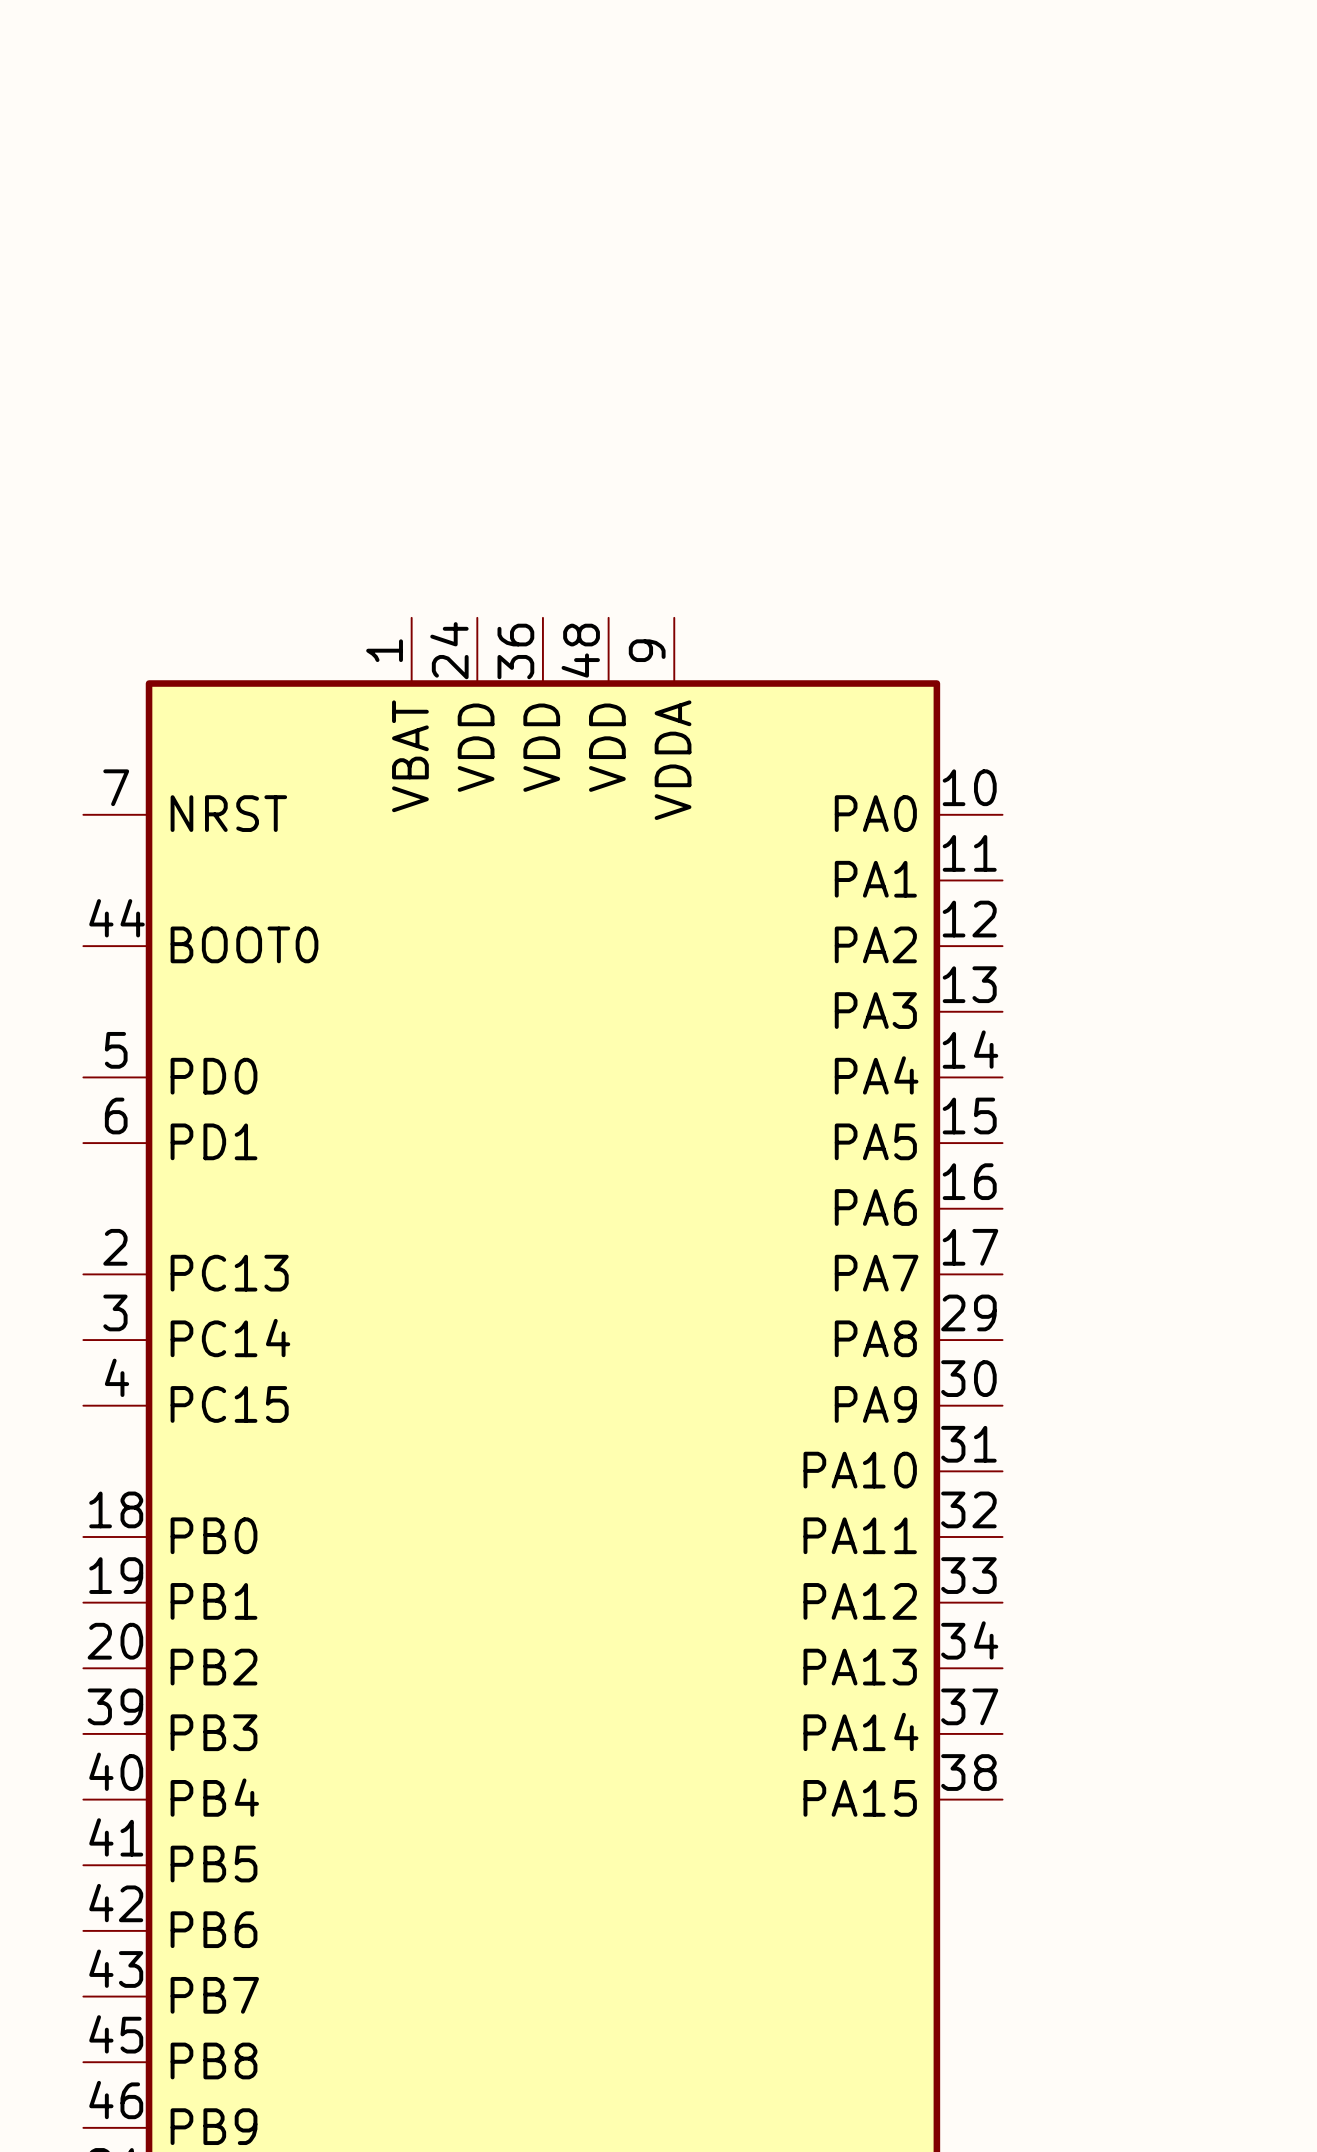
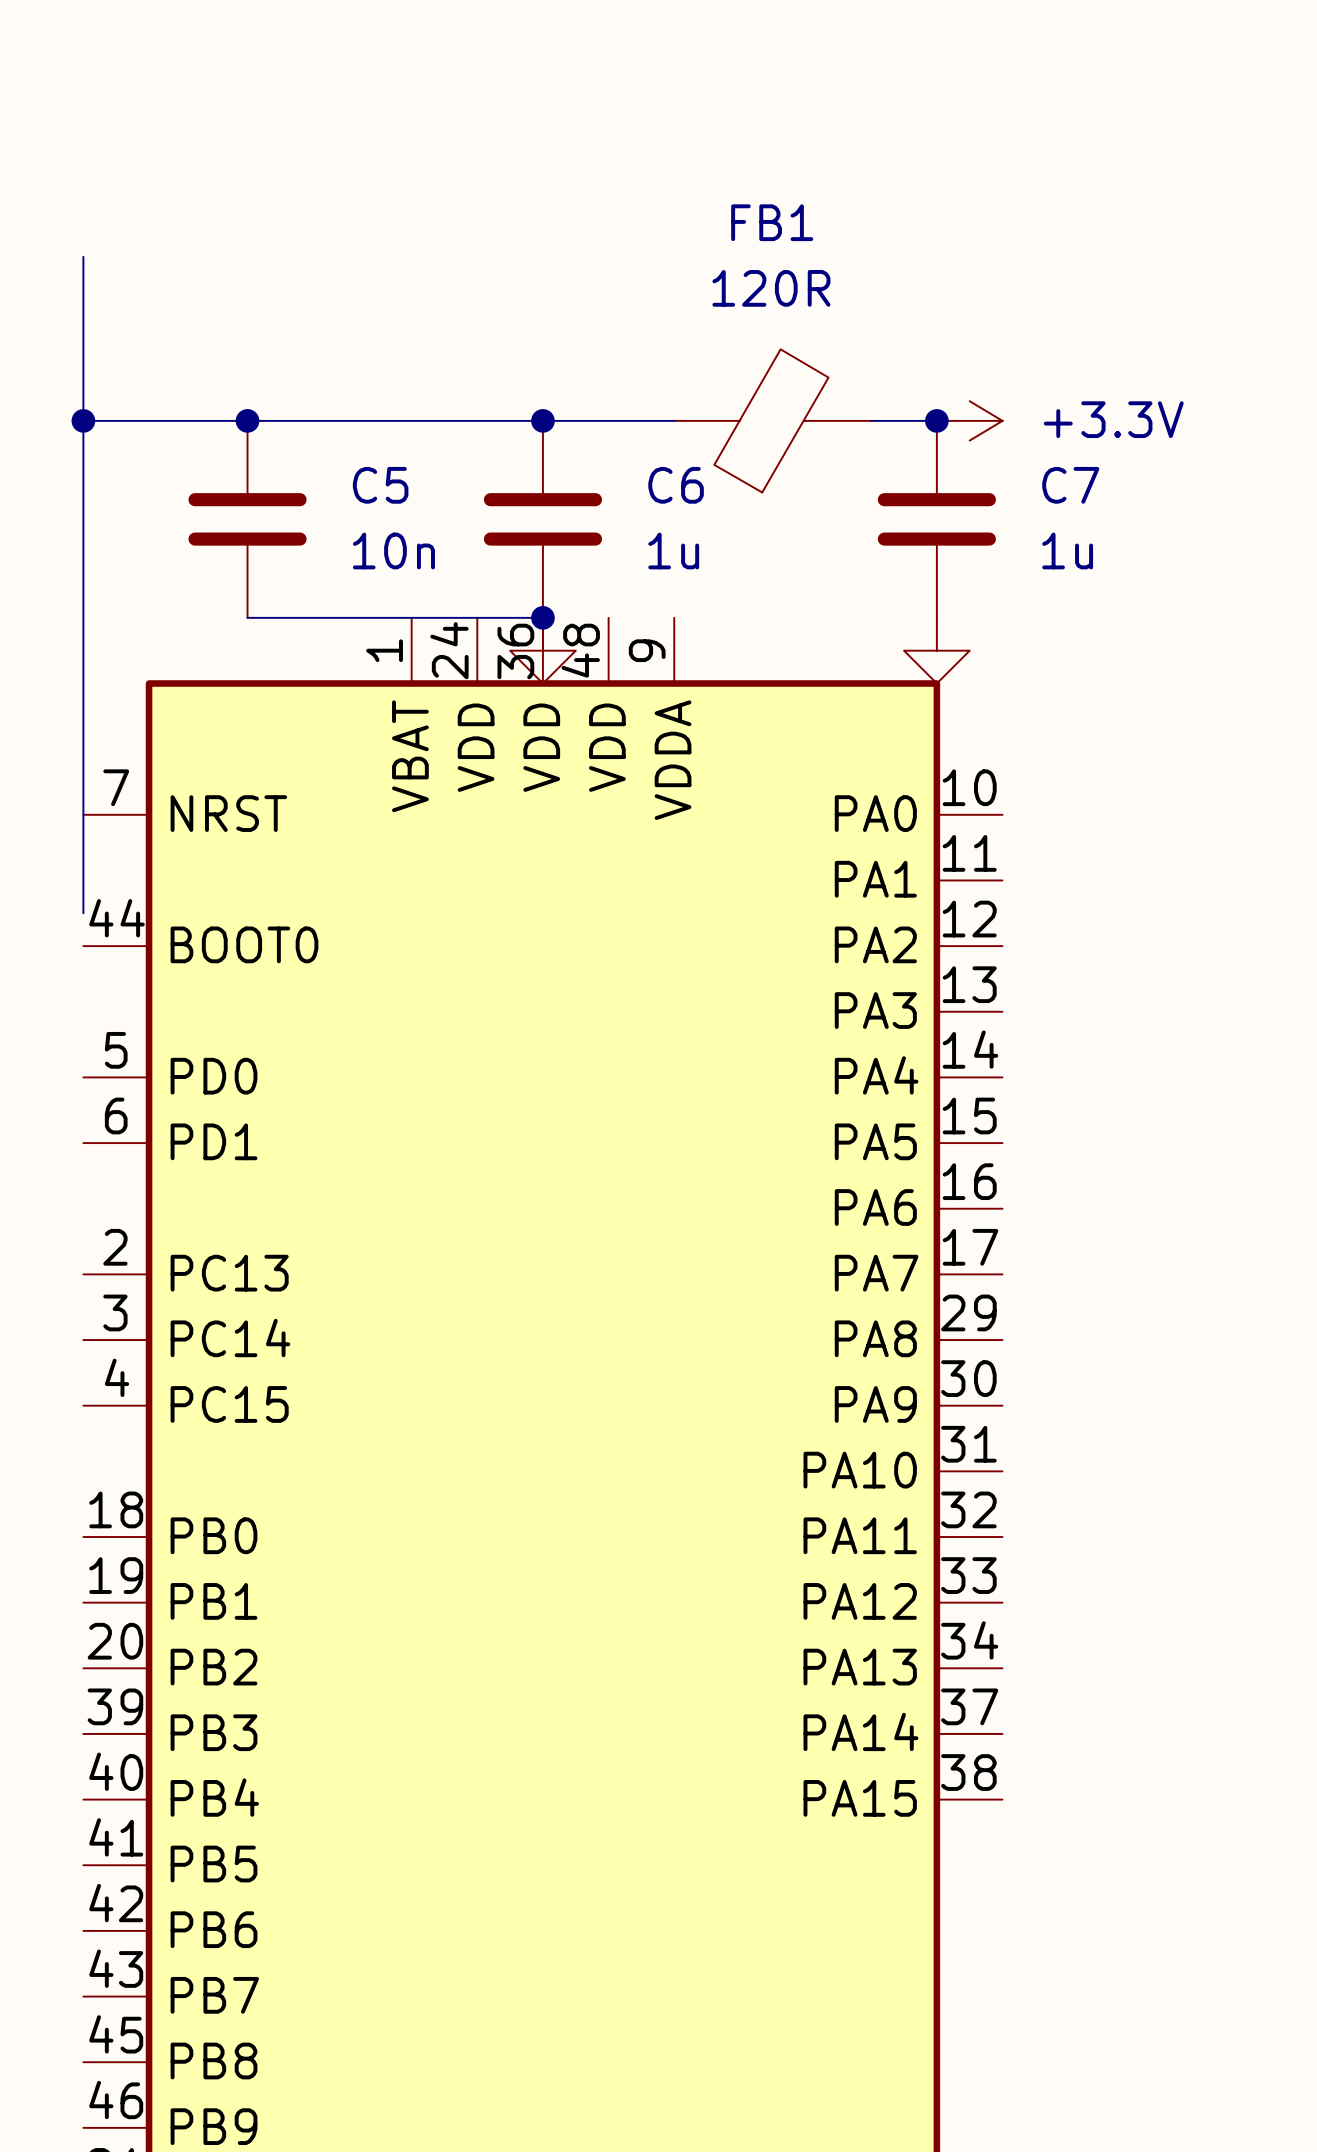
wire: none -> (83, 256) (83, 913)
wire: none -> (83, 420) (674, 420)
junction: none -> (83, 420)
junction: none -> (247, 420)
junction: none -> (542, 420)
FB1: none -> 120R (772, 420)
wire: none -> (871, 420) (936, 420)
junction: none -> (936, 420)
power symbol: none -> +3.3V (969, 420)
C5: none -> 10n (247, 519)
C6: none -> 1u (542, 519)
C7: none -> 1u (936, 519)
wire: none -> (247, 617) (542, 617)
junction: none -> (542, 617)
power symbol: none -> (542, 650)
power symbol: none -> (936, 650)

